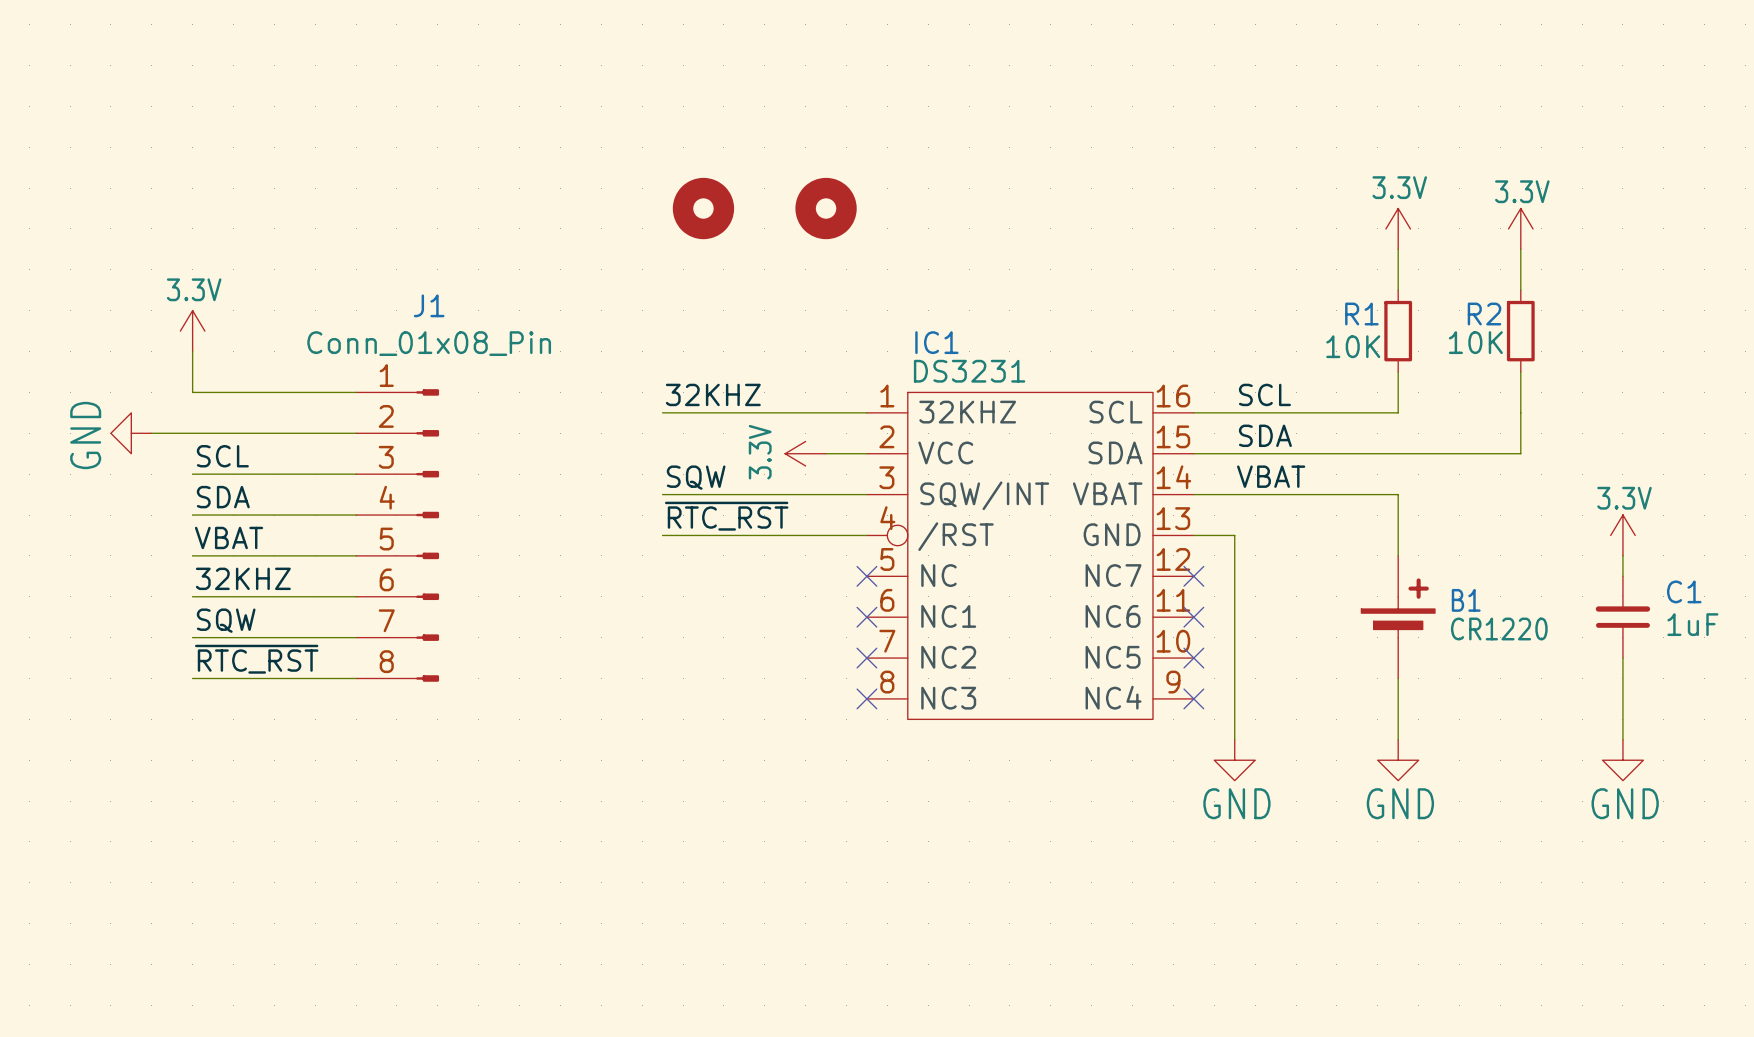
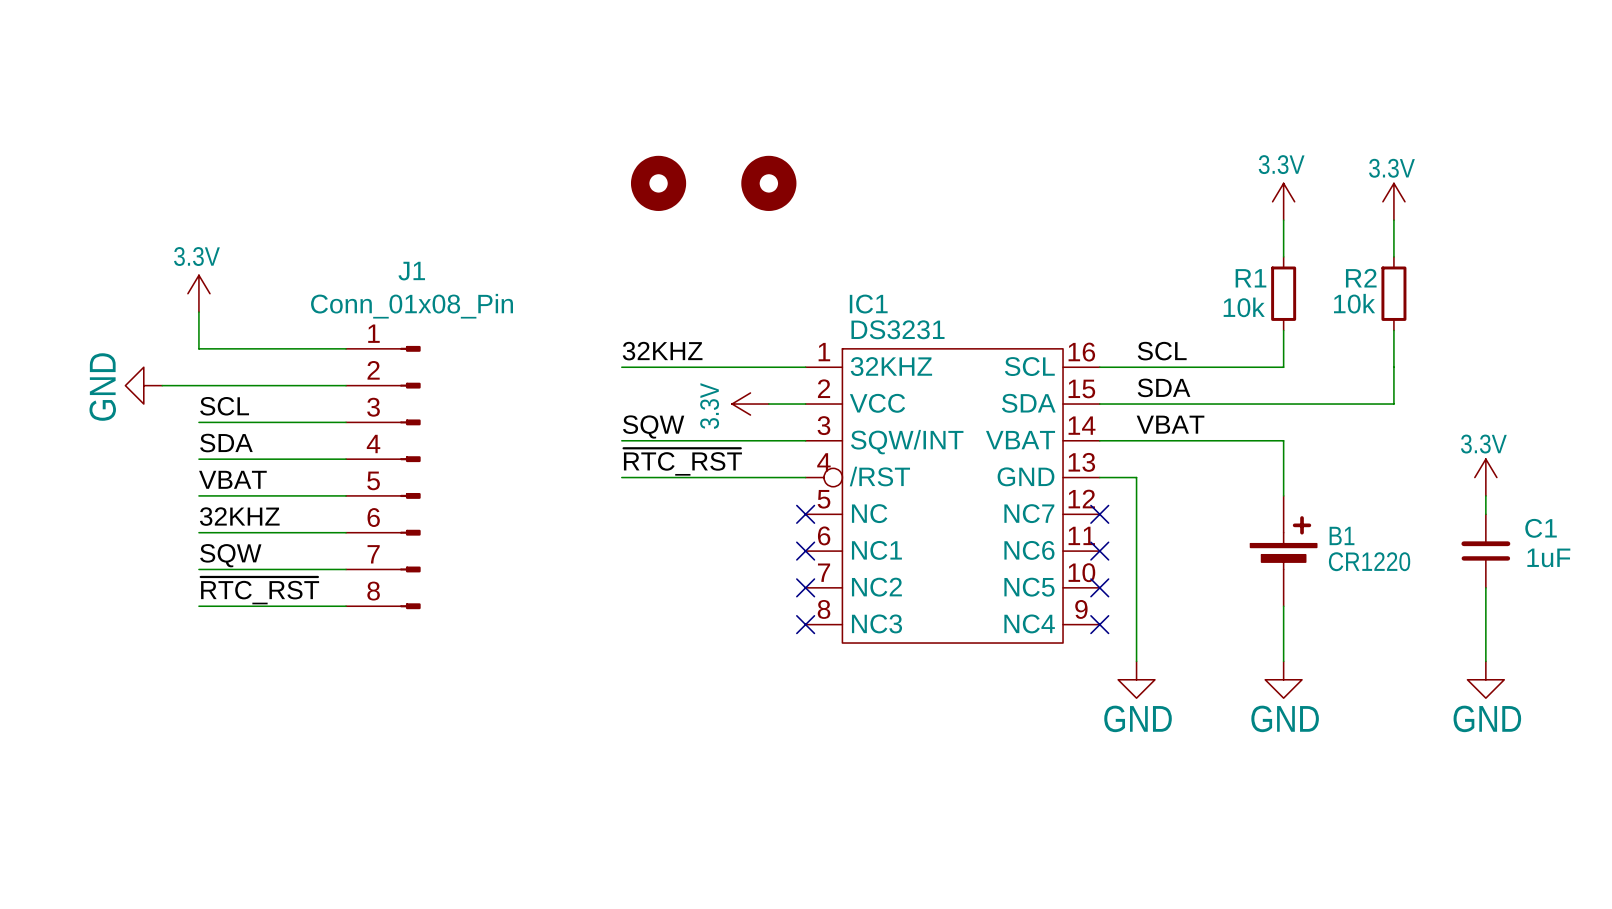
R2 value: 10K (1475, 342) -> 10k (1354, 303)
R1 value: 10K (1353, 346) -> 10k (1244, 307)

